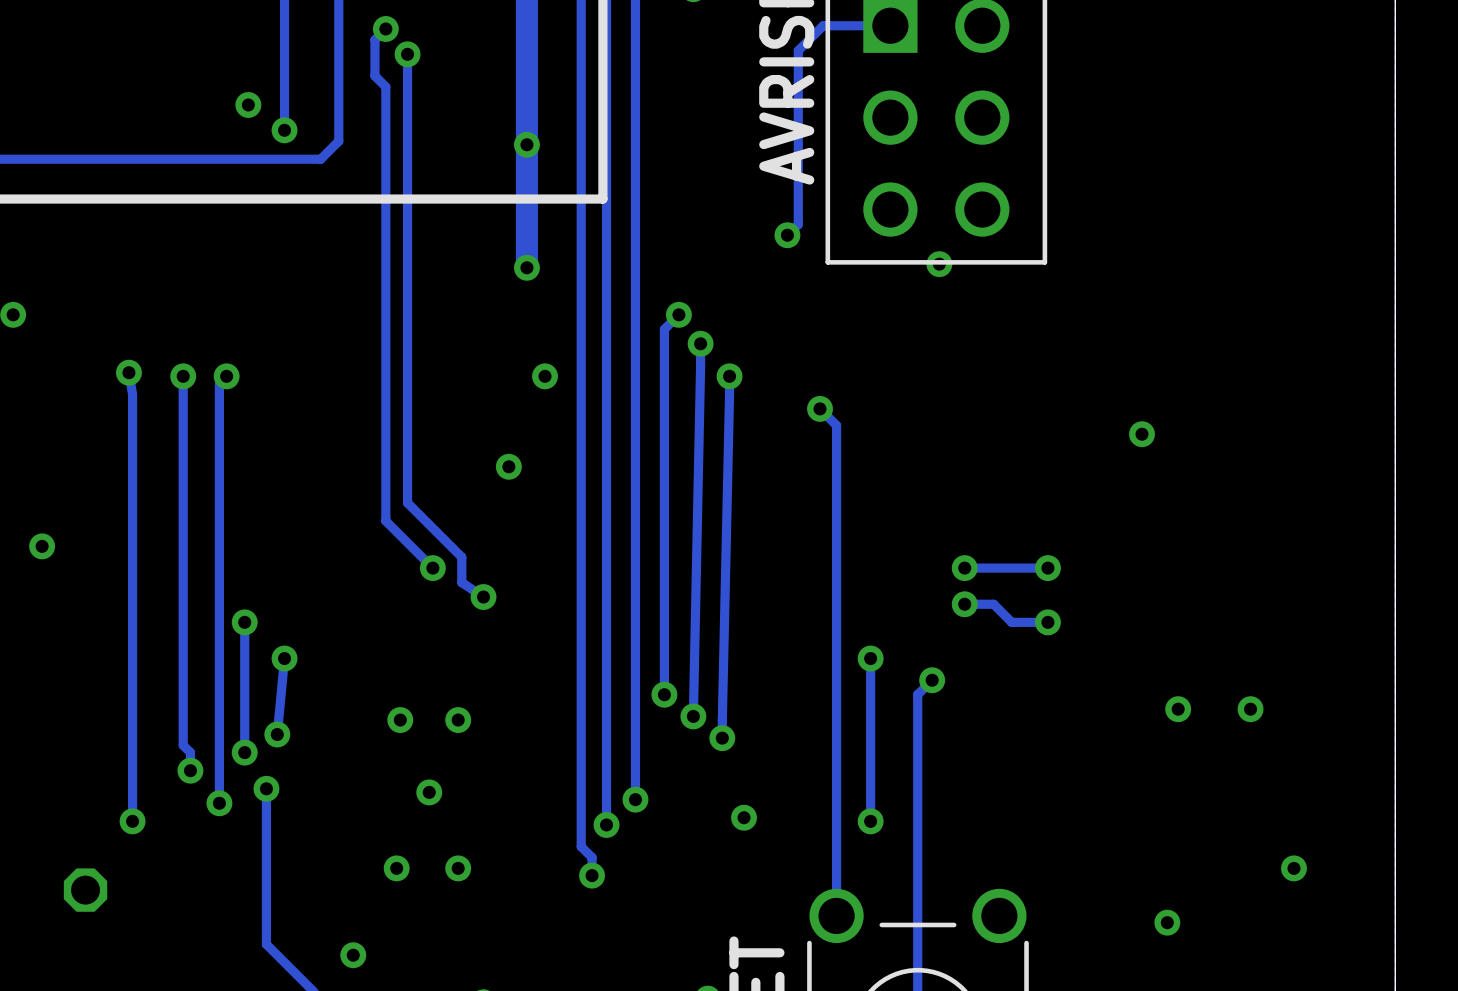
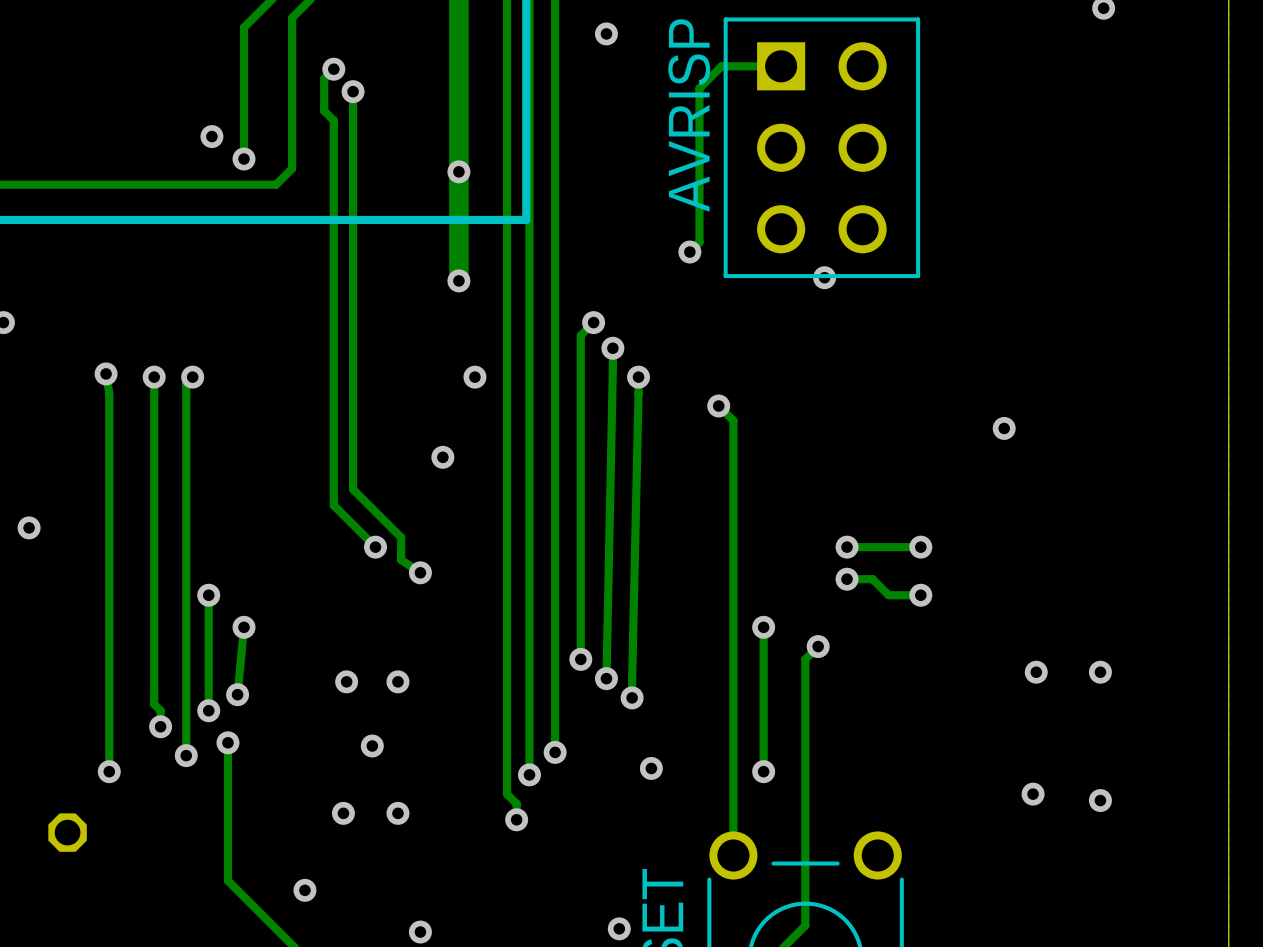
via: none -> (1033, 794)
via position: (1293, 868) -> (1100, 800)
via: (1167, 922) -> none

